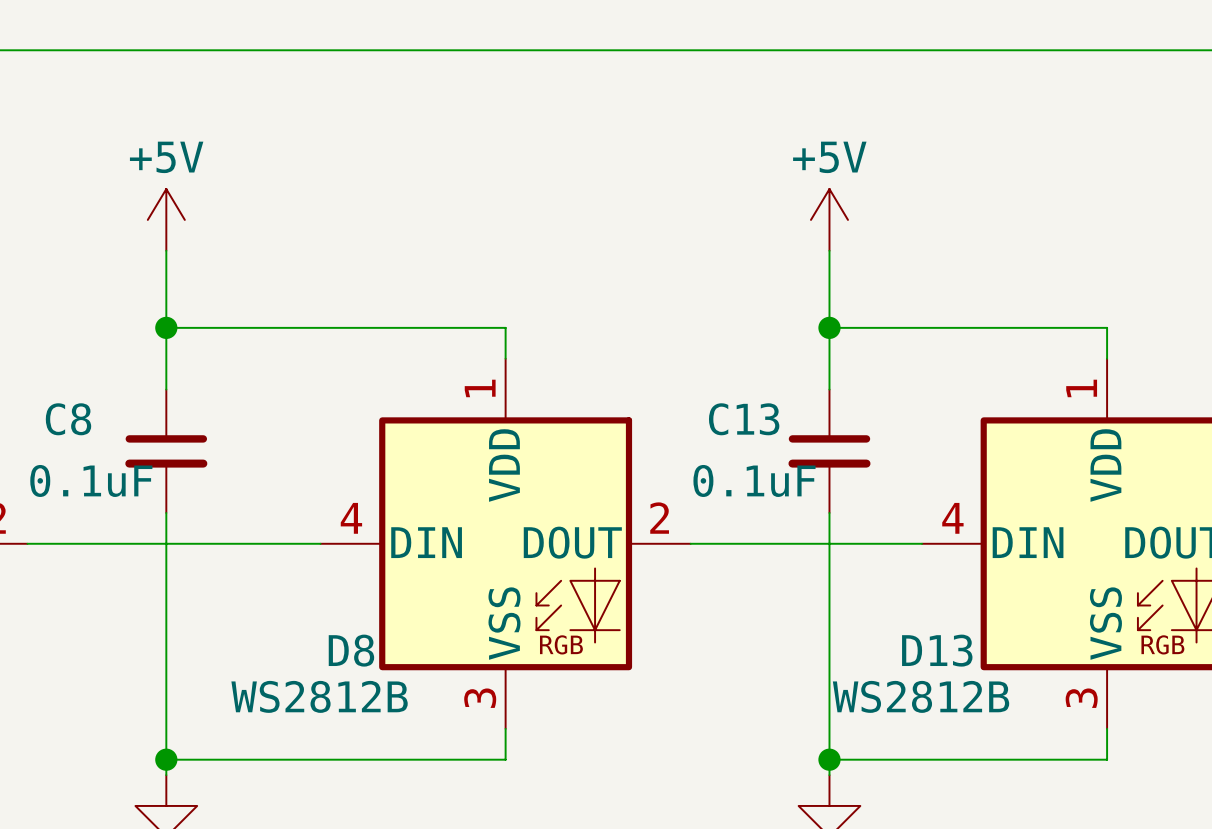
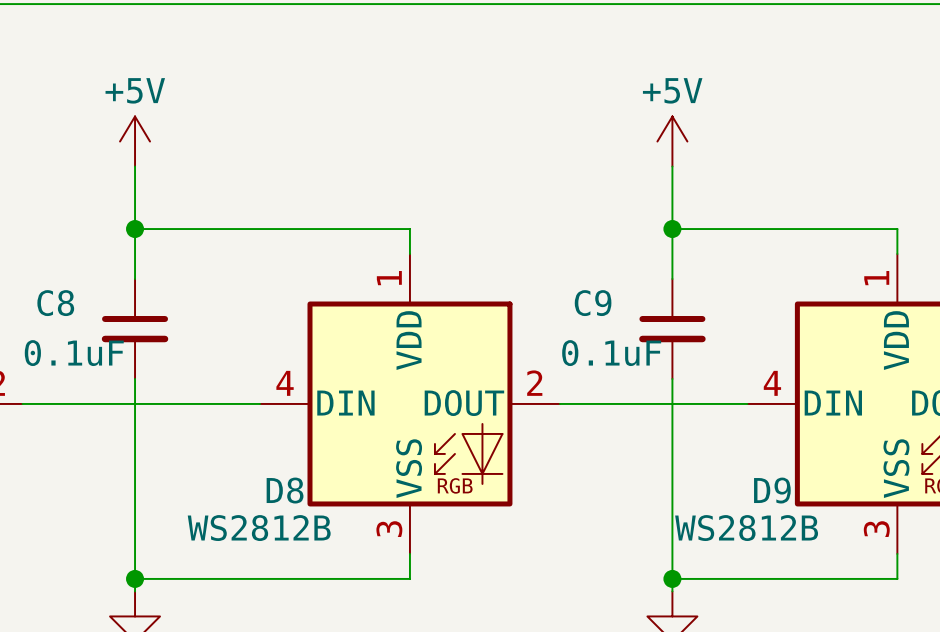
C13 name: C13 (744, 419) -> C9 (593, 303)
D13 name: D13 (937, 650) -> D9 (772, 490)

